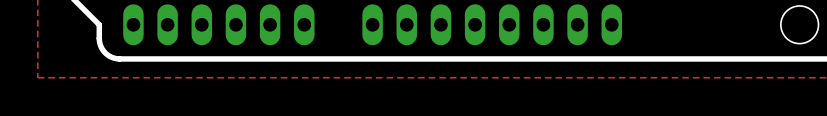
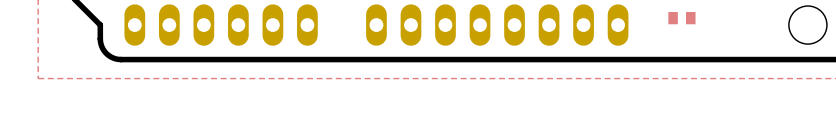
part: none -> (681, 18)

